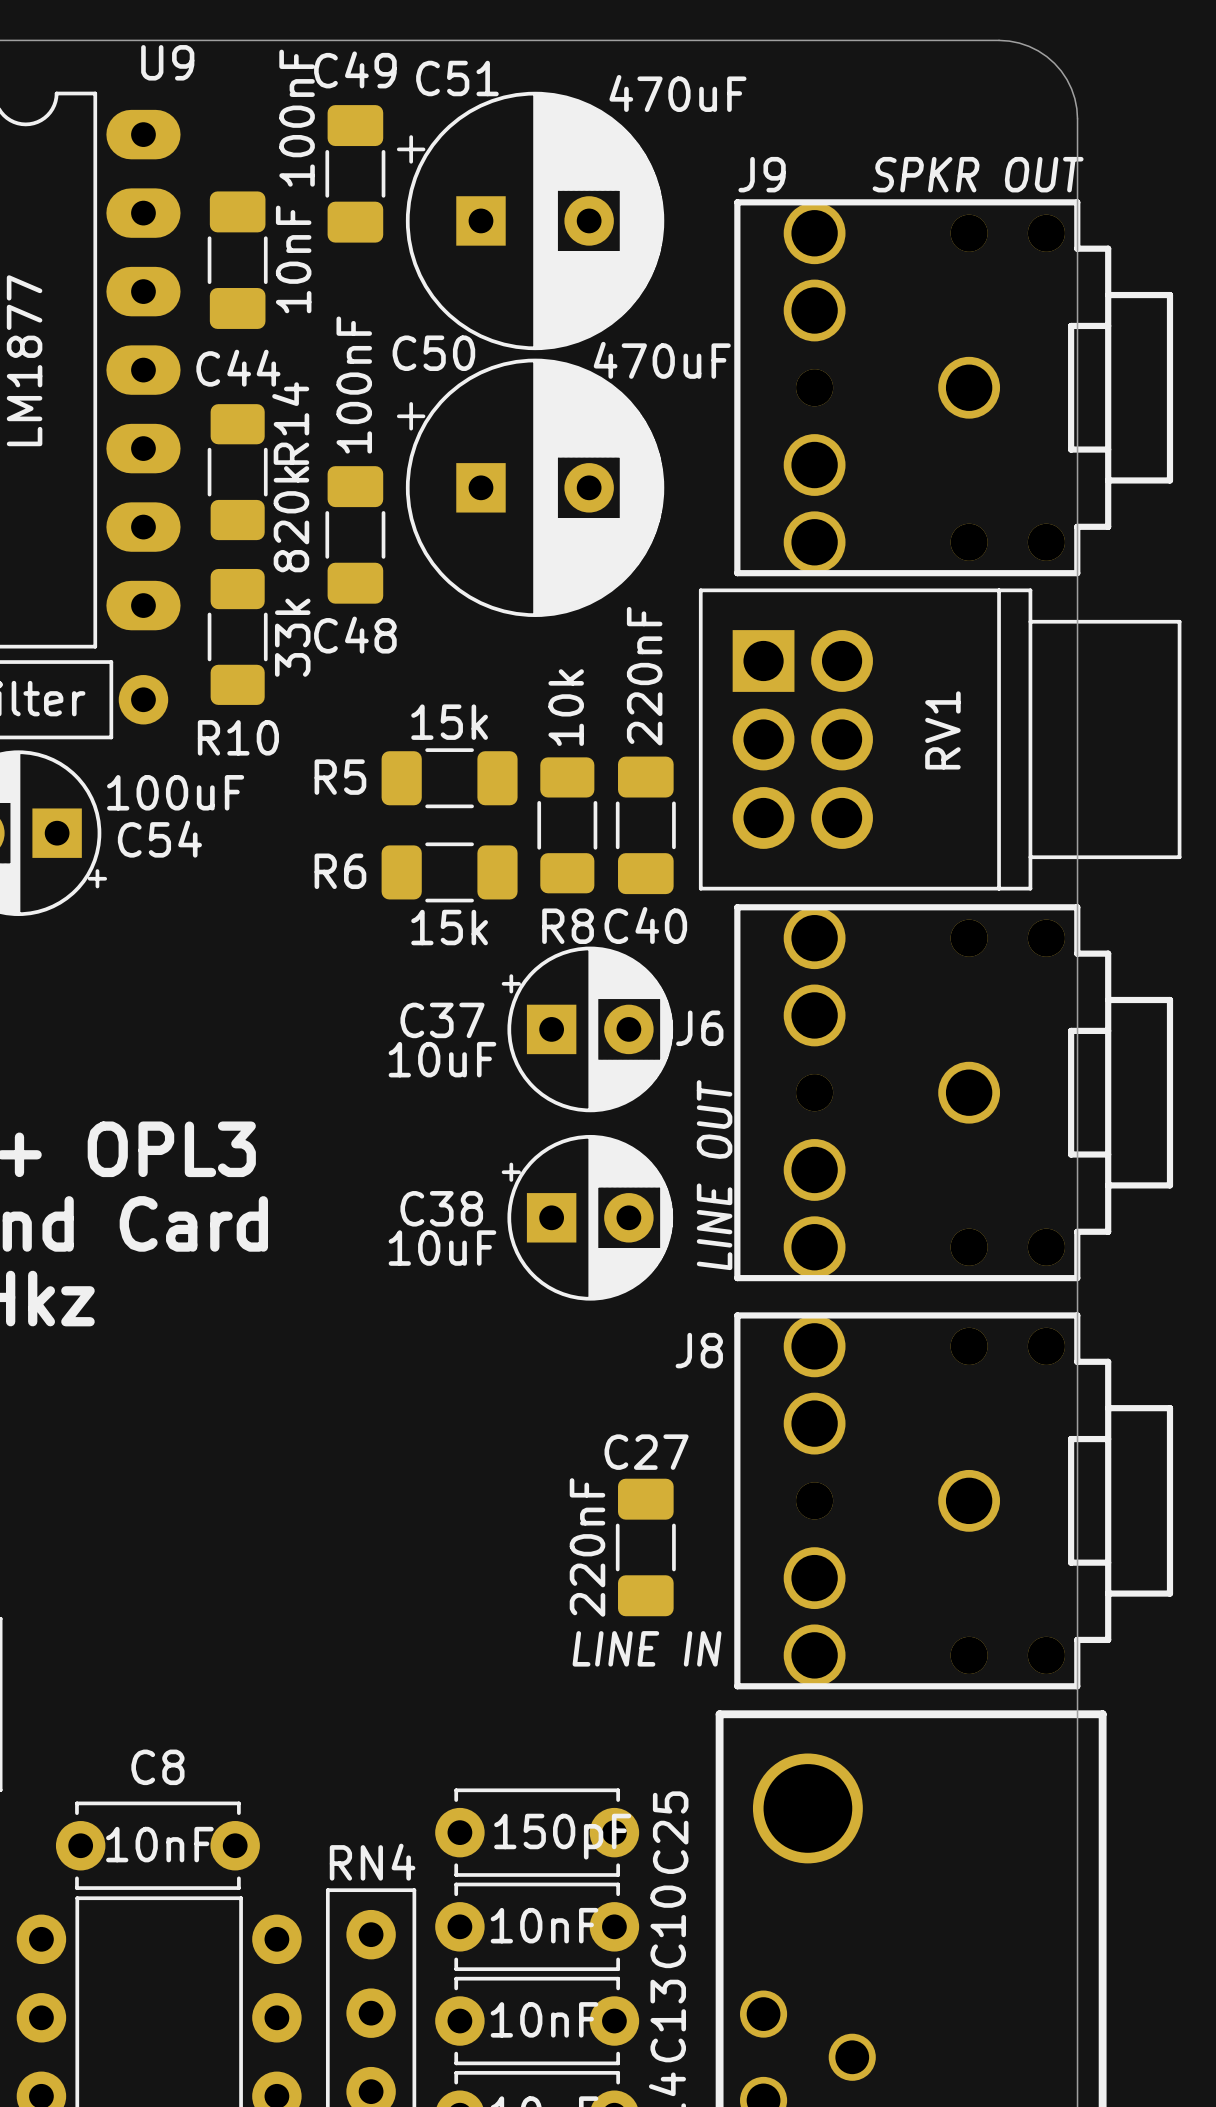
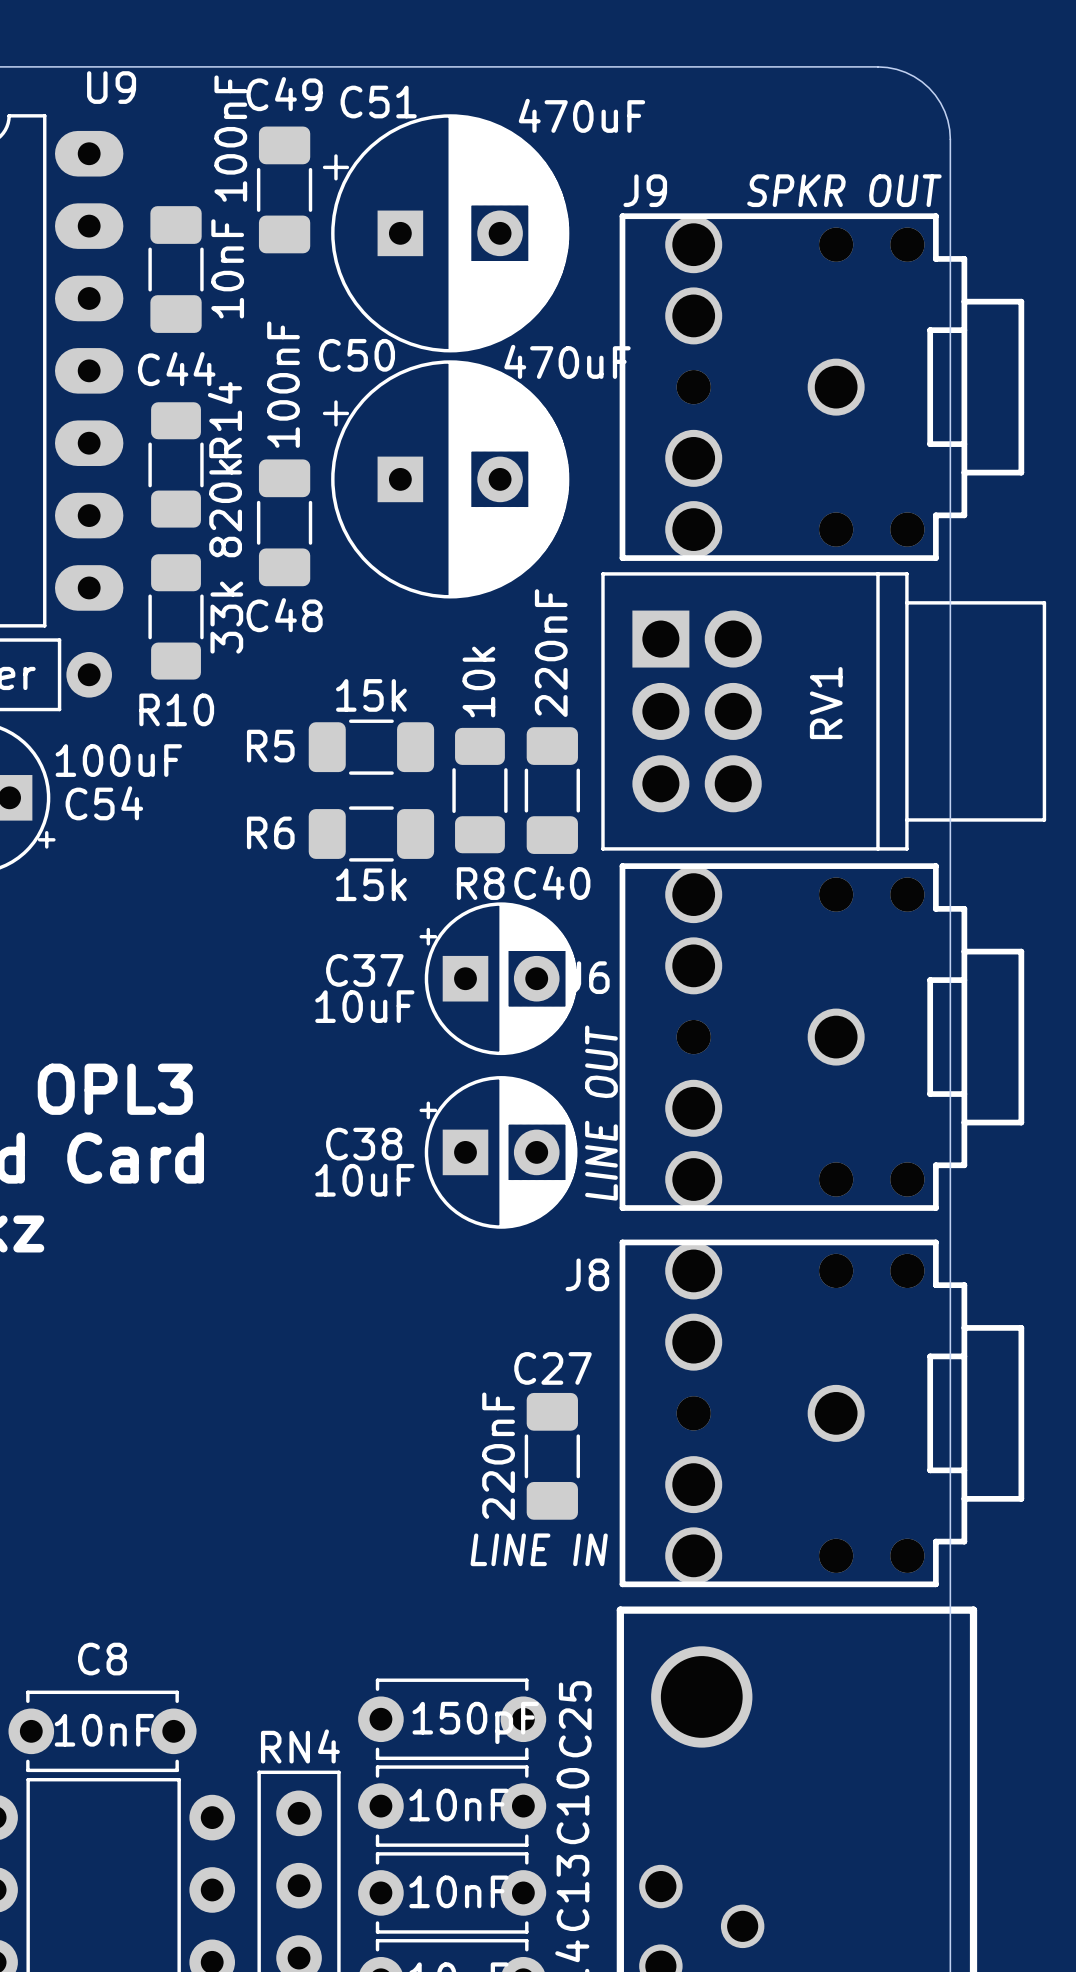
J9 position: (953, 387) -> (821, 387)
J6 position: (953, 1092) -> (821, 1037)
J8 position: (953, 1500) -> (821, 1413)

